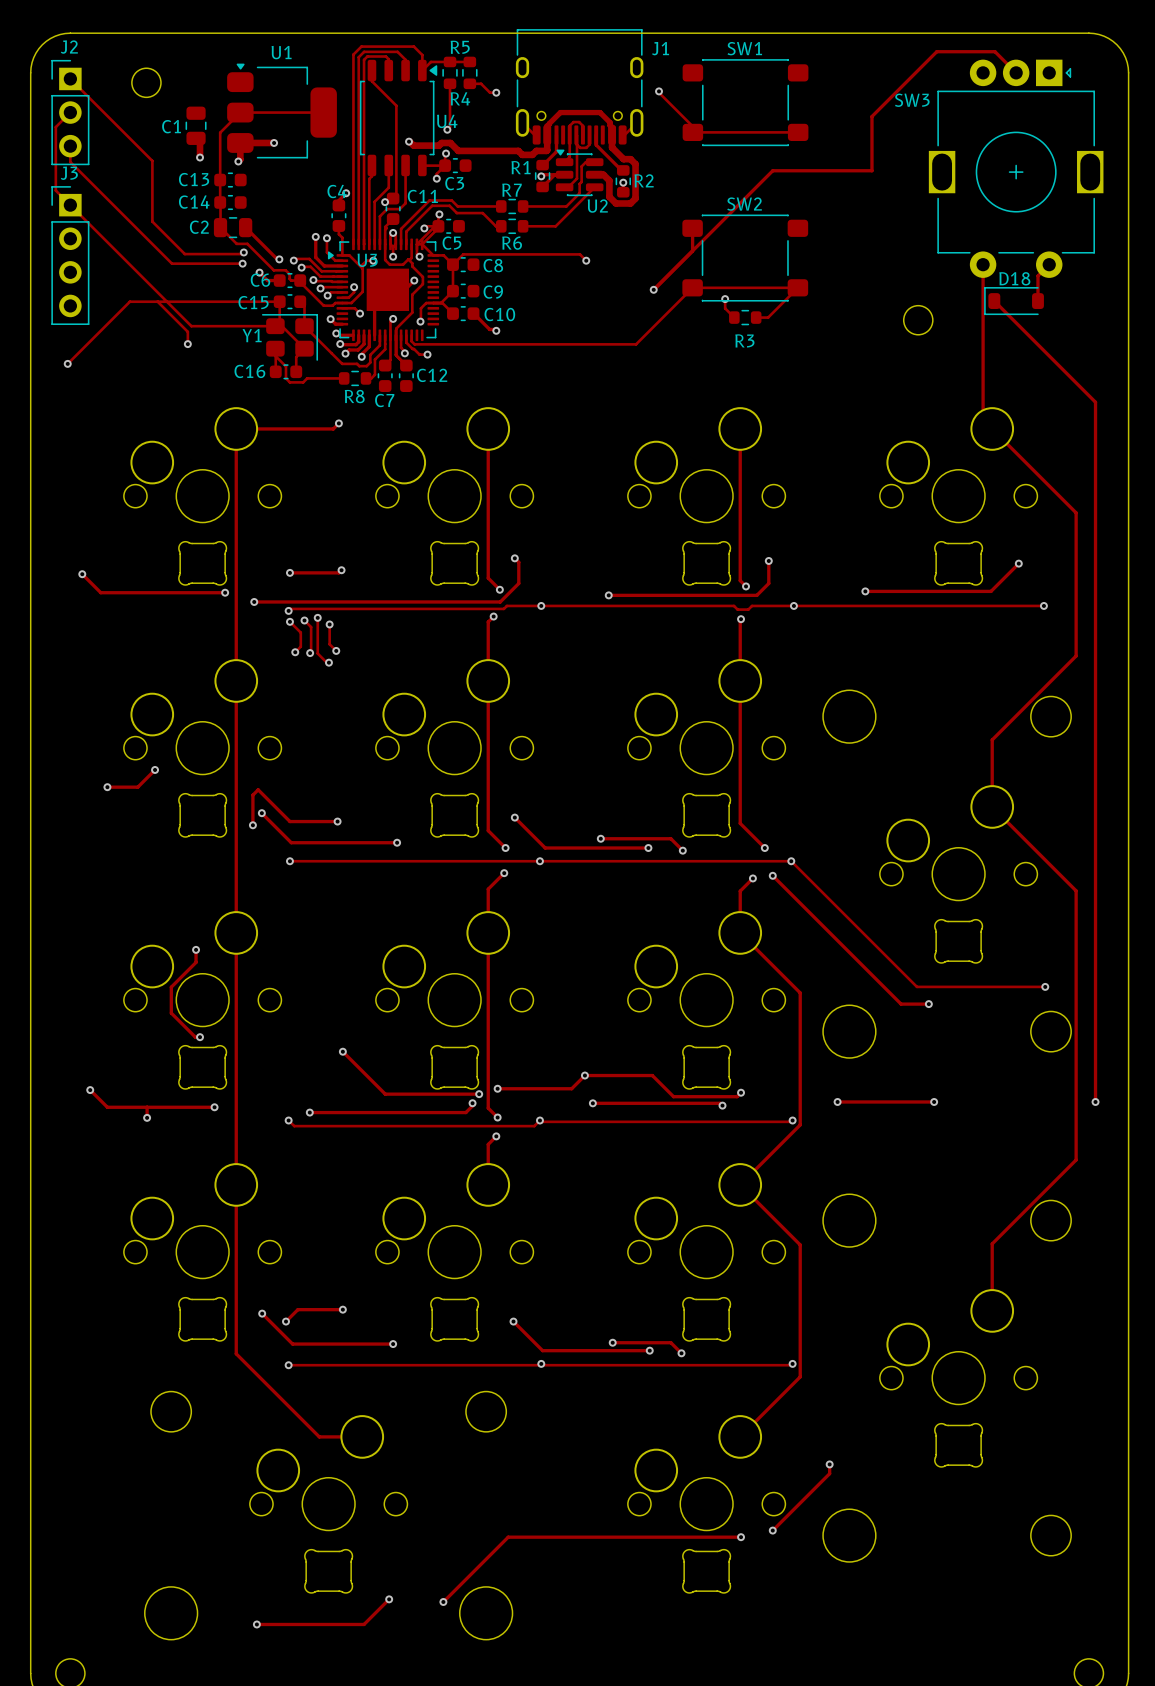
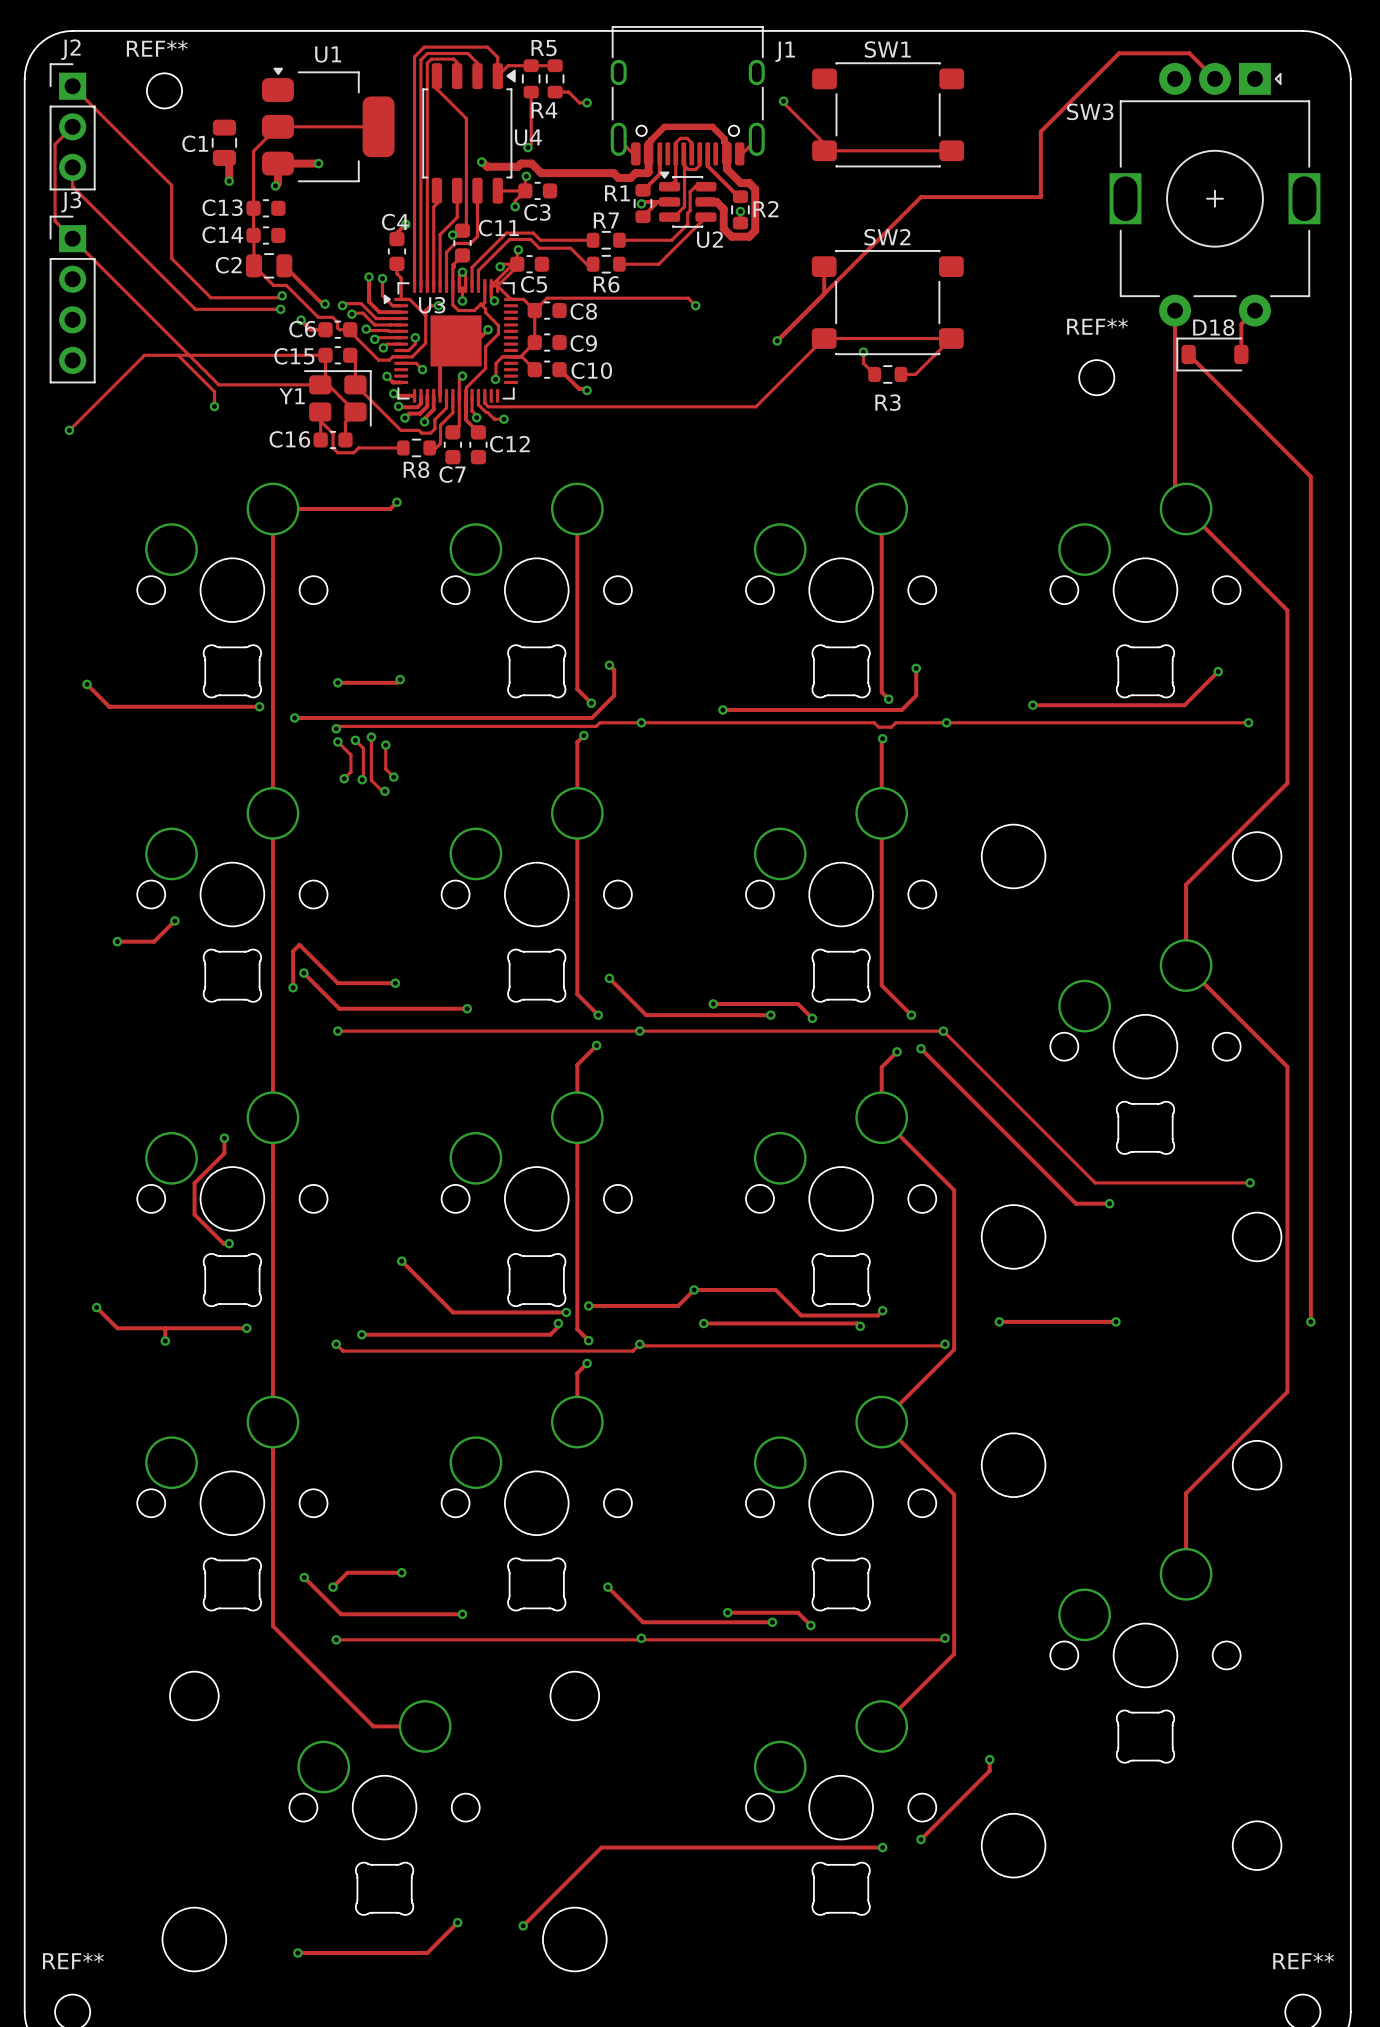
REF** name: none -> REF** (157, 48)
REF** name: none -> REF** (1097, 326)
REF** name: none -> REF** (73, 1961)
REF** name: none -> REF** (1303, 1961)

